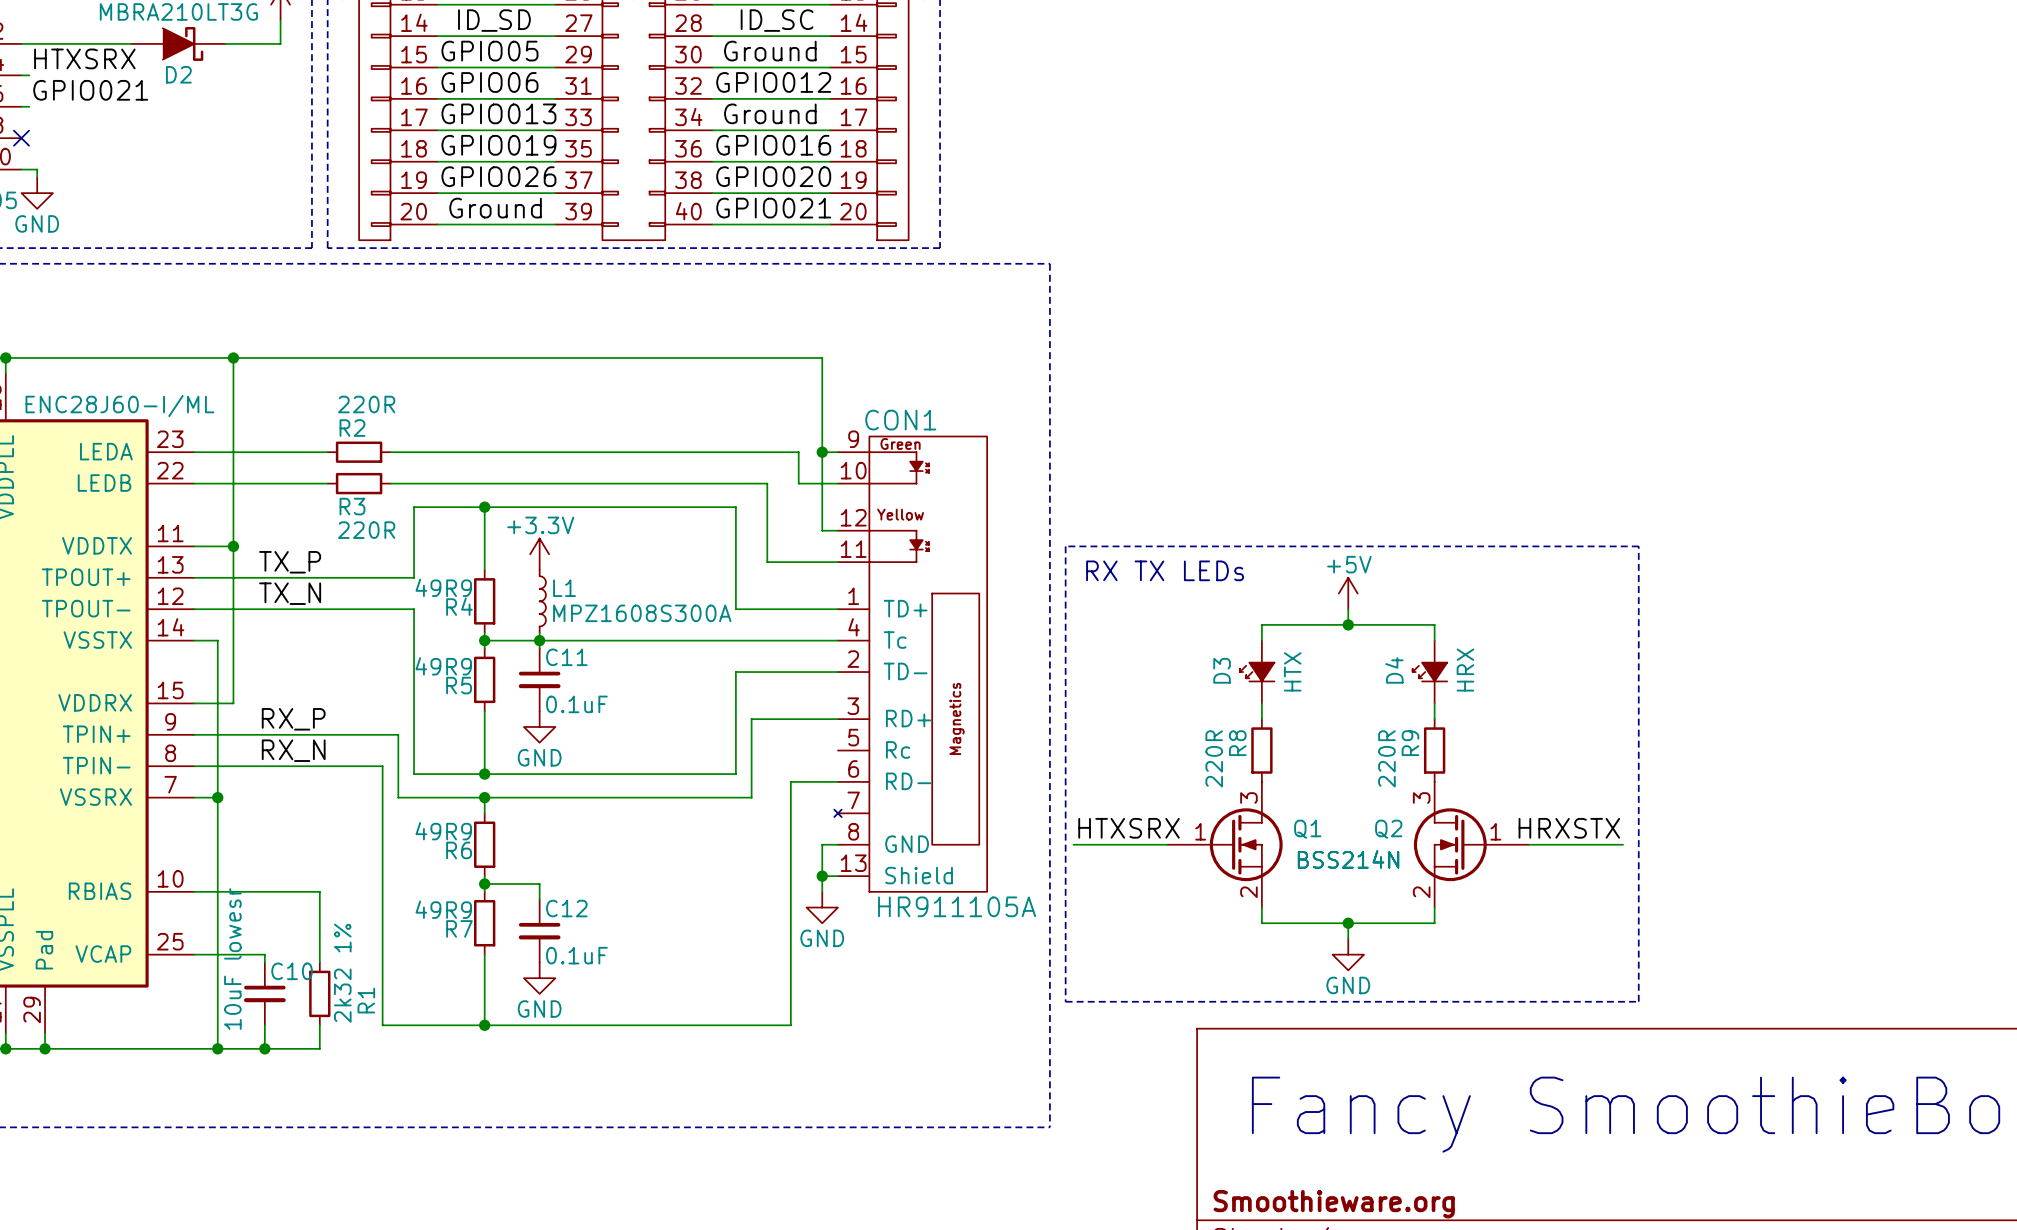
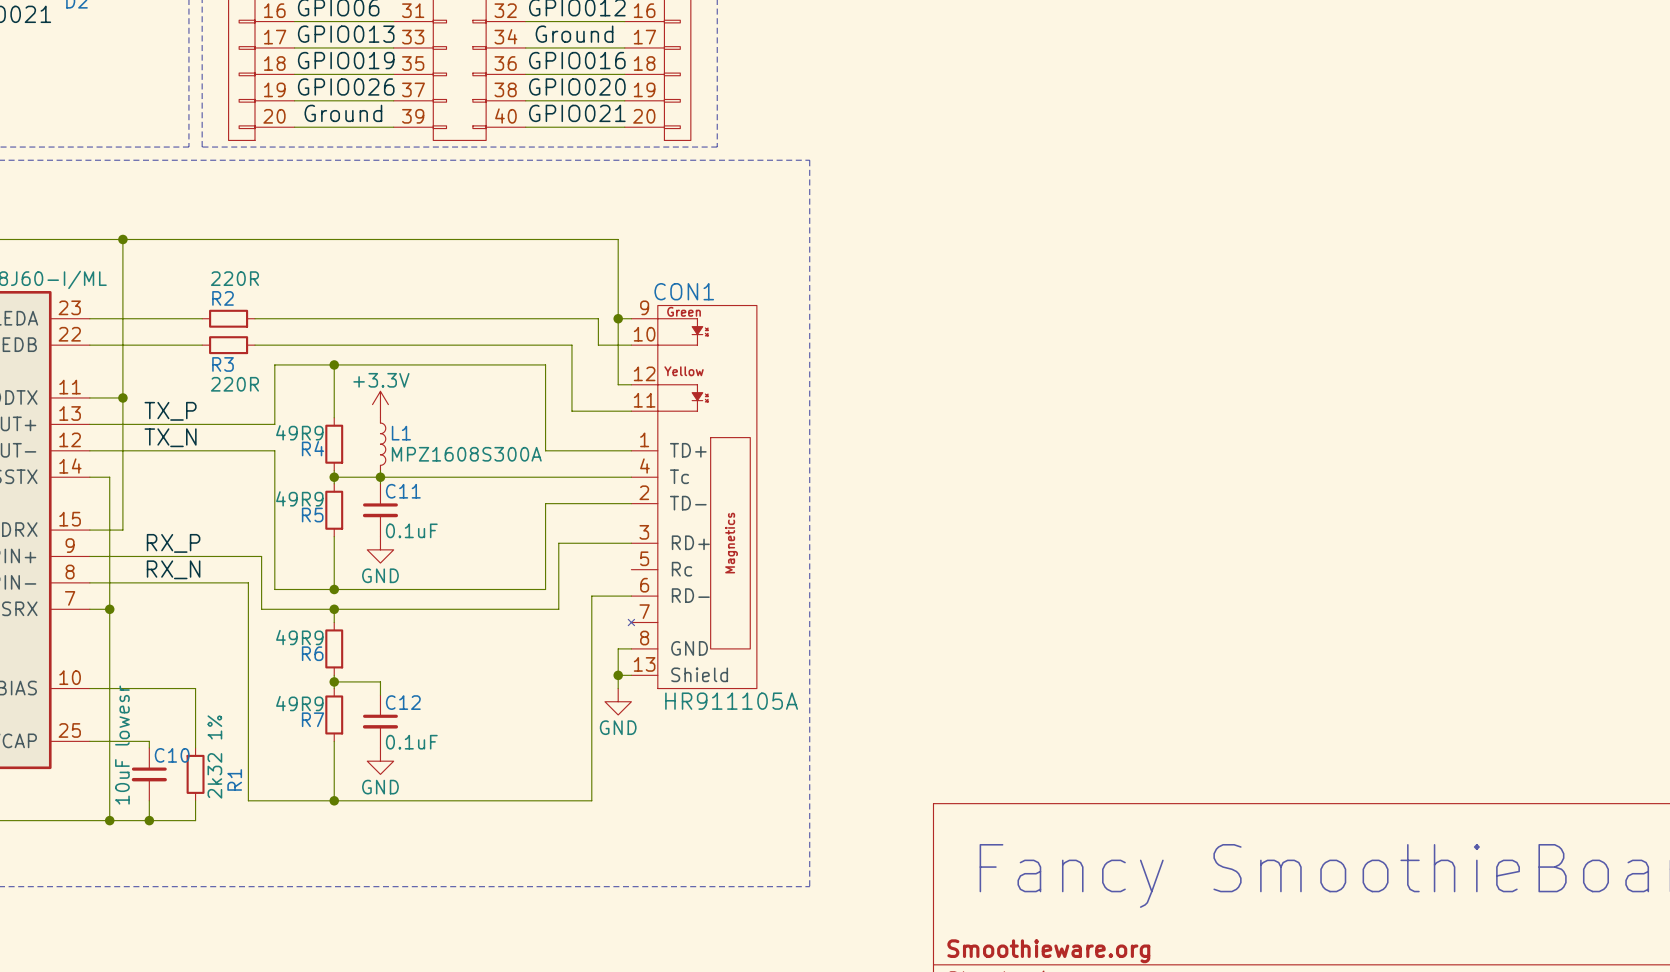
line: (1065, 546) (1065, 1001) (1638, 1001) (1638, 546) (1065, 546) -> none
text: RX TX LEDs (1165, 570) -> none
power symbol: +5V (1348, 593) -> none
wire: (1348, 609) (1348, 624) -> none
junction: (1348, 624) -> none
wire: (1261, 640) (1261, 624) (1434, 624) (1434, 640) -> none
D3: HTX (1257, 672) -> none
D4: HRX (1429, 672) -> none
wire: (1261, 703) (1261, 719) -> none
wire: (1434, 703) (1434, 719) -> none
R8: 220R (1261, 750) -> none
R9: 220R (1434, 750) -> none
label: HTXSRX (1129, 828) -> none
label: HRXSTX (1569, 828) -> none
wire: (1073, 844) (1167, 844) -> none
Q1: BSS214N (1225, 844) -> none
Q2: BSS214N (1471, 844) -> none
wire: (1528, 844) (1623, 844) -> none
wire: (1261, 907) (1261, 923) (1434, 923) (1434, 907) -> none
wire: (1348, 923) (1348, 938) -> none
junction: (1348, 923) -> none
power symbol: GND (1348, 954) -> none

